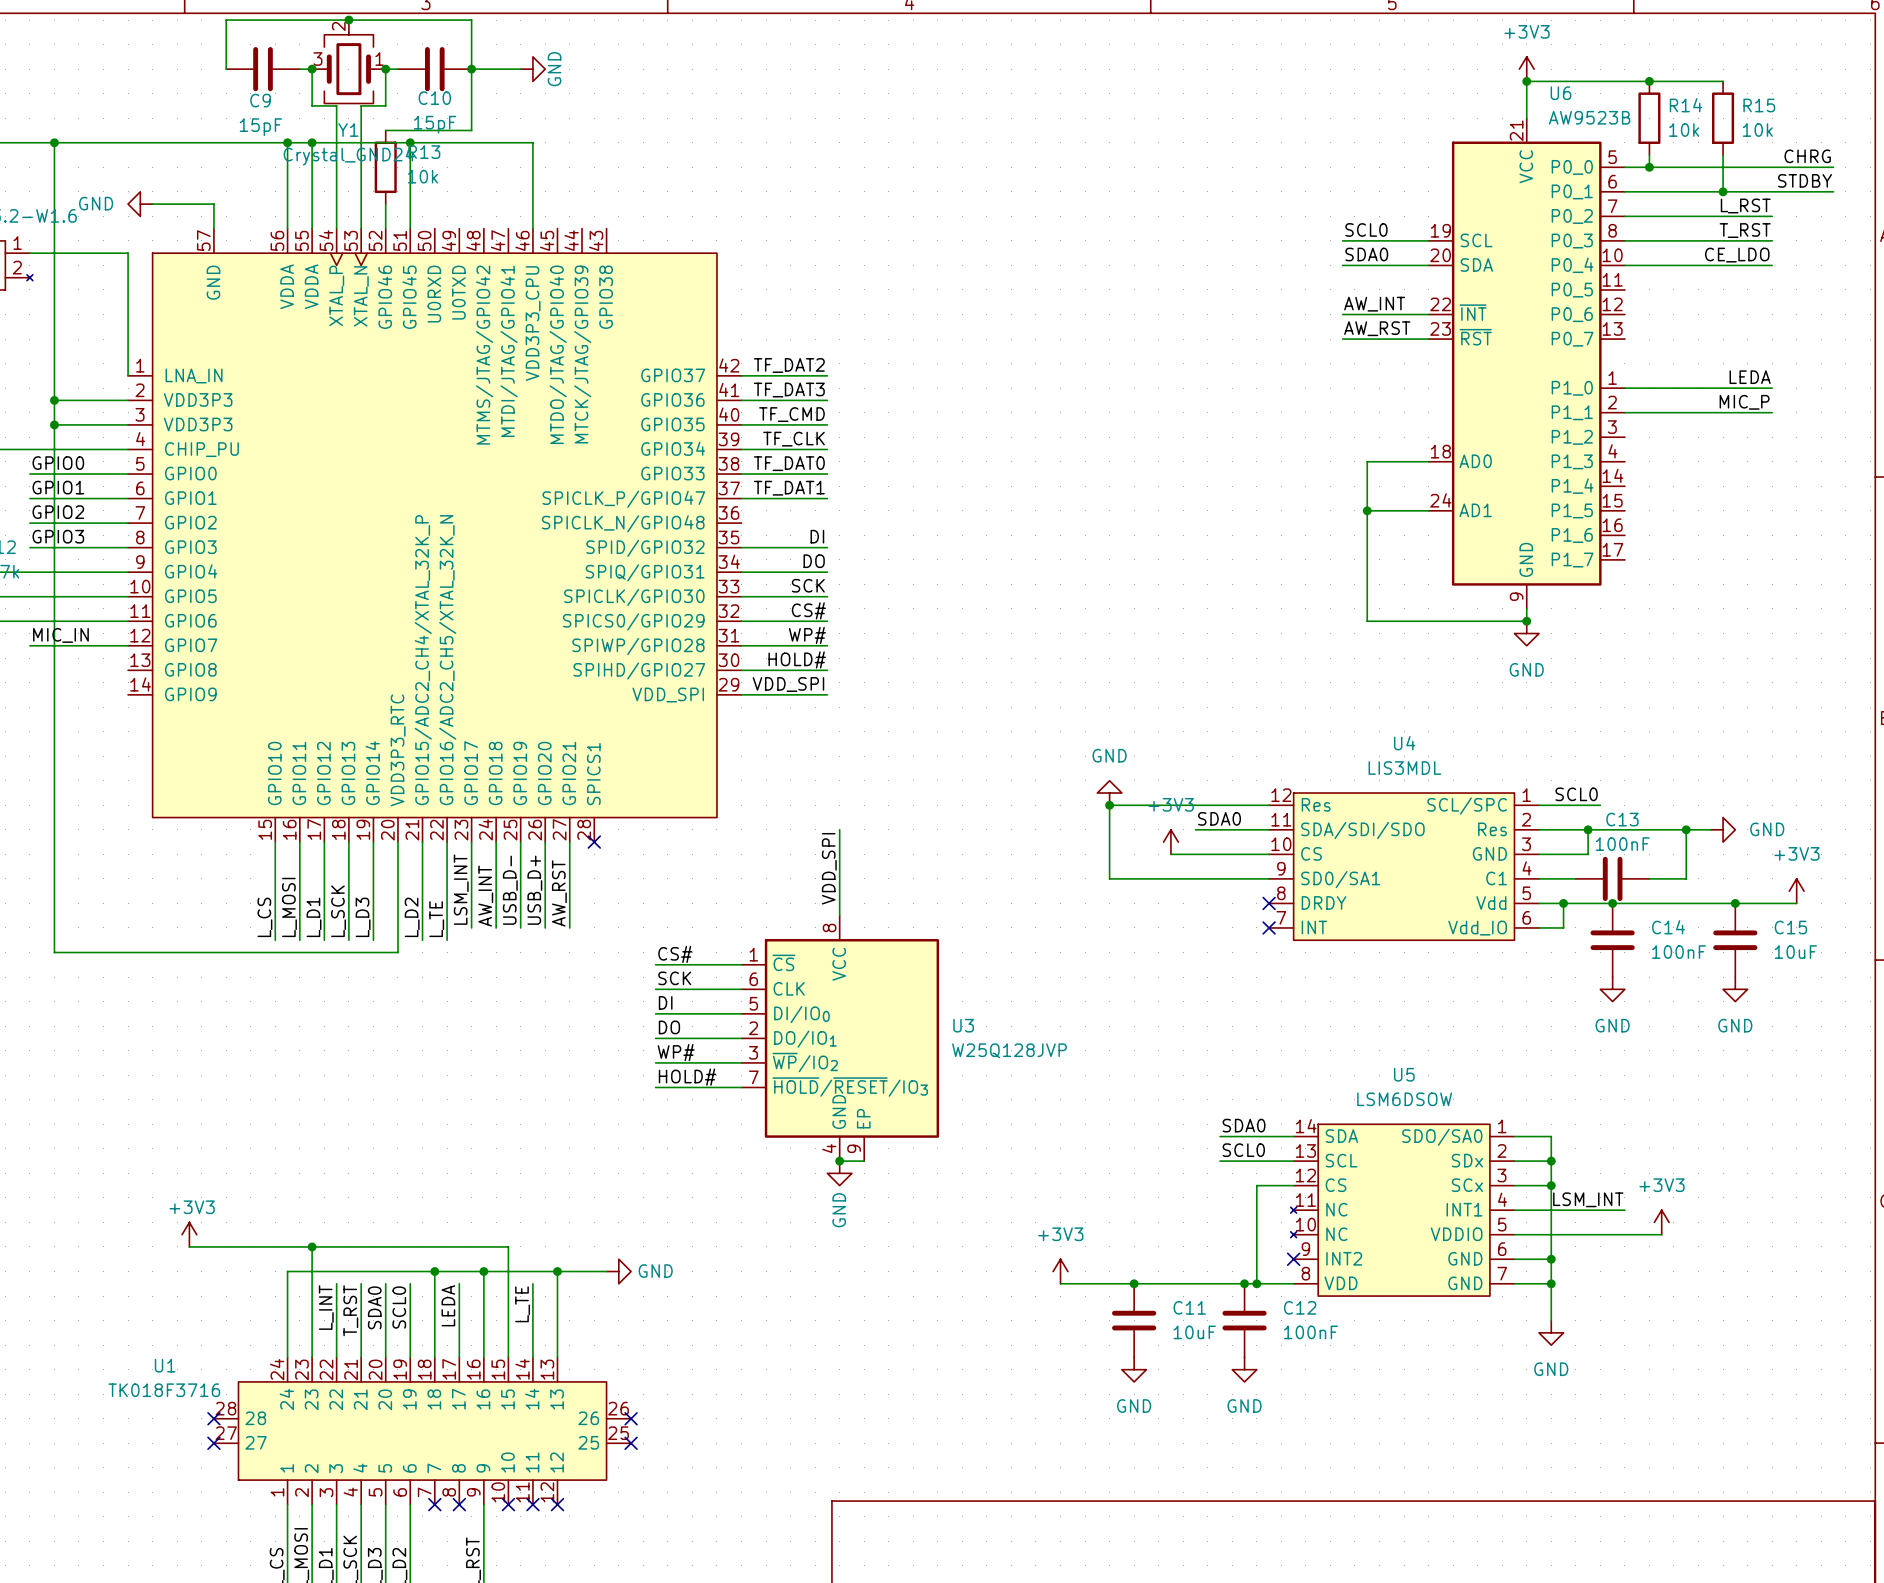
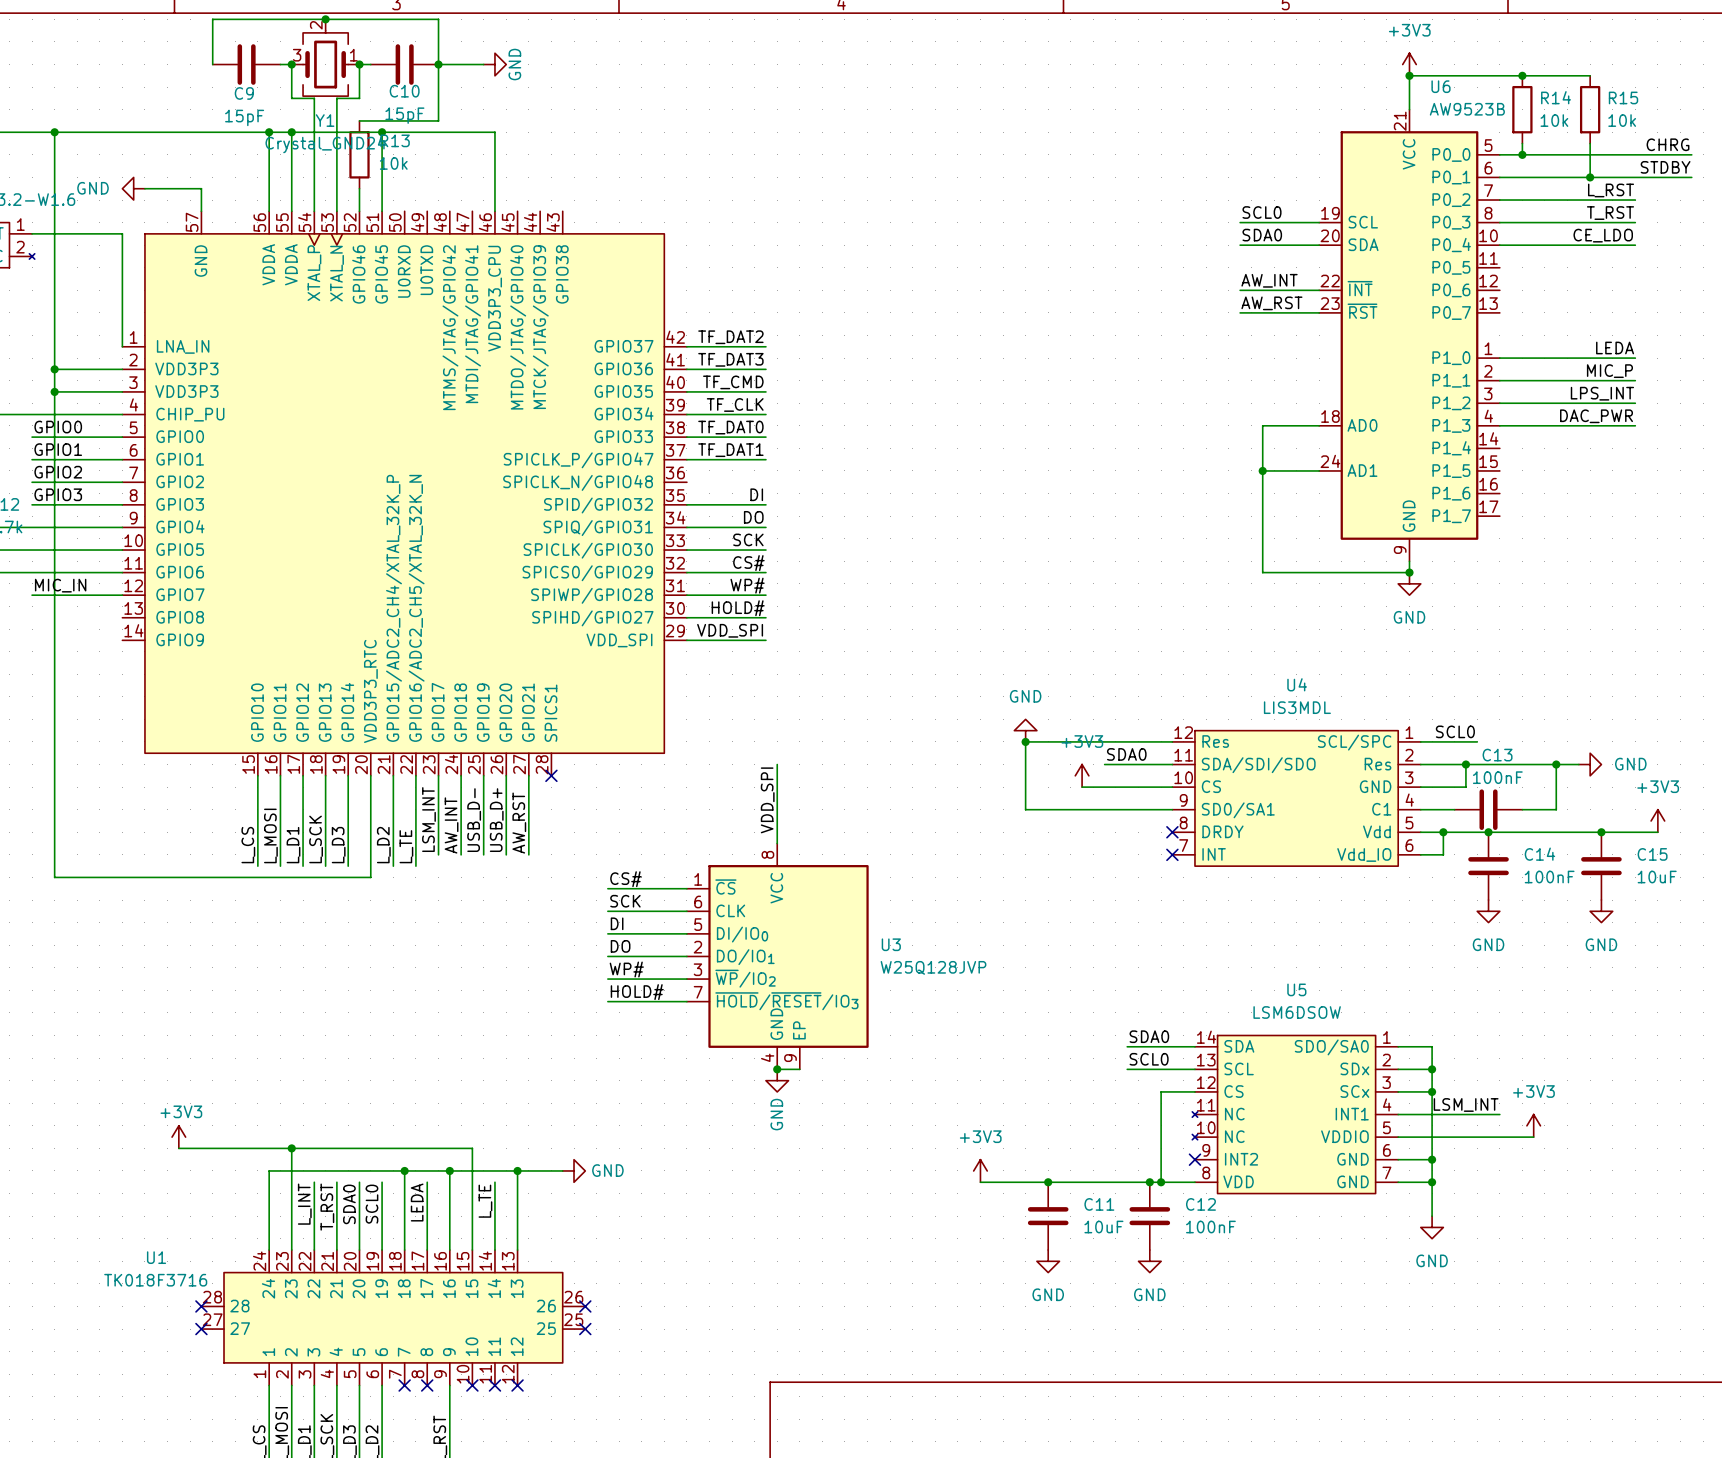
label: none -> LPS_INT (1602, 393)
wire: none -> (1499, 403) (1635, 403)
label: none -> DAC_PWR (1596, 416)
wire: none -> (1499, 425) (1635, 425)

